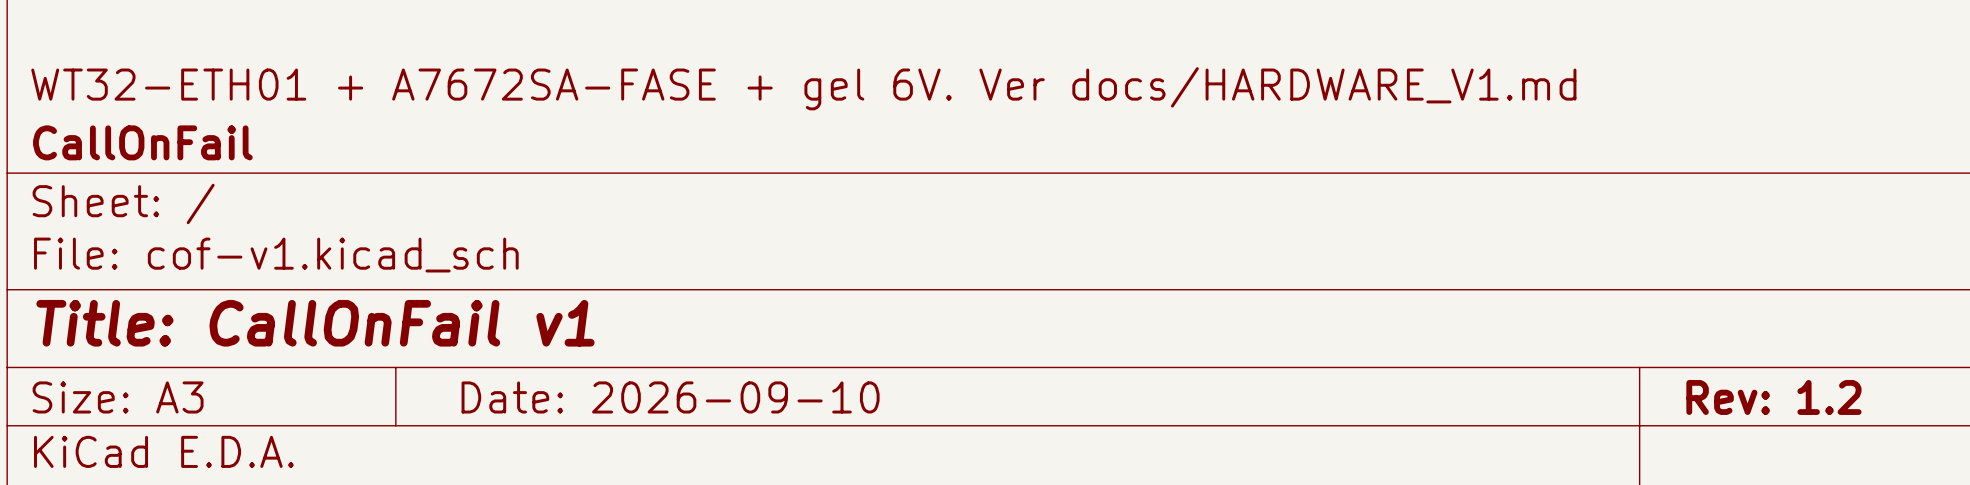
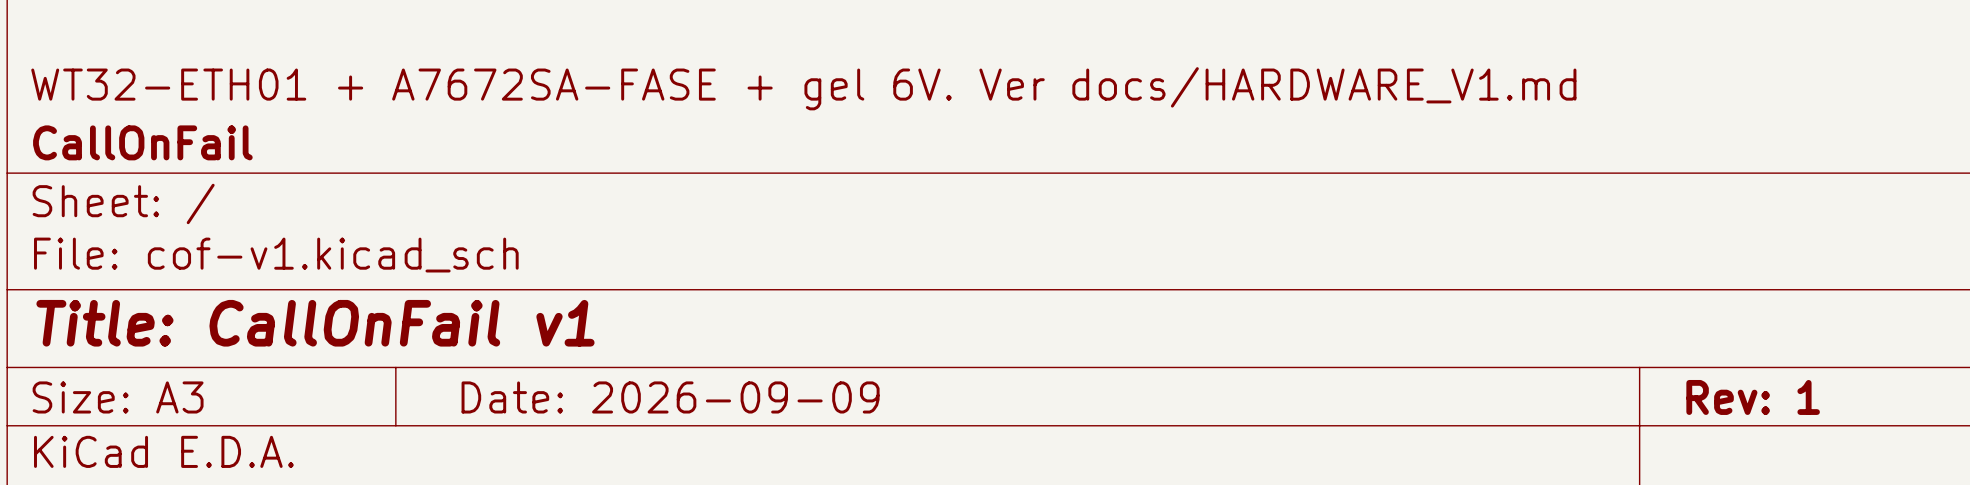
title block: Date: 2026-09-10 (670, 397) -> Date: 2026-09-09 (670, 397)
title block: Rev: 1.2 (1773, 397) -> Rev: 1 (1753, 397)

